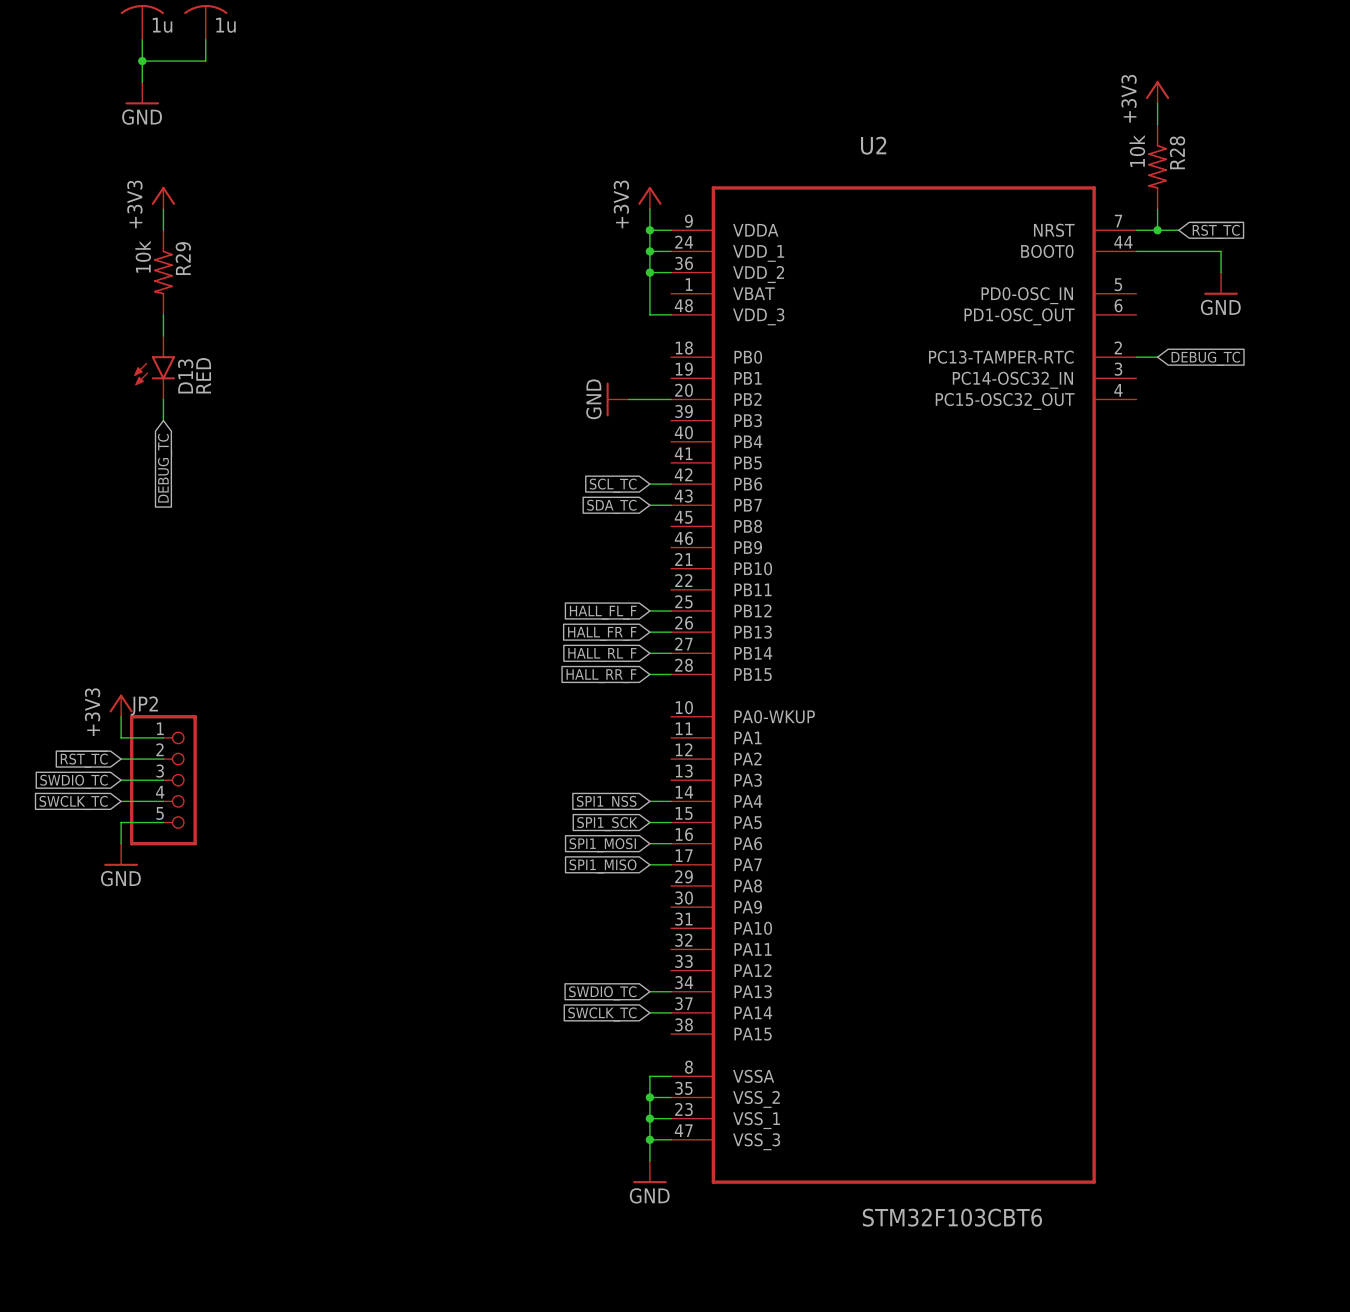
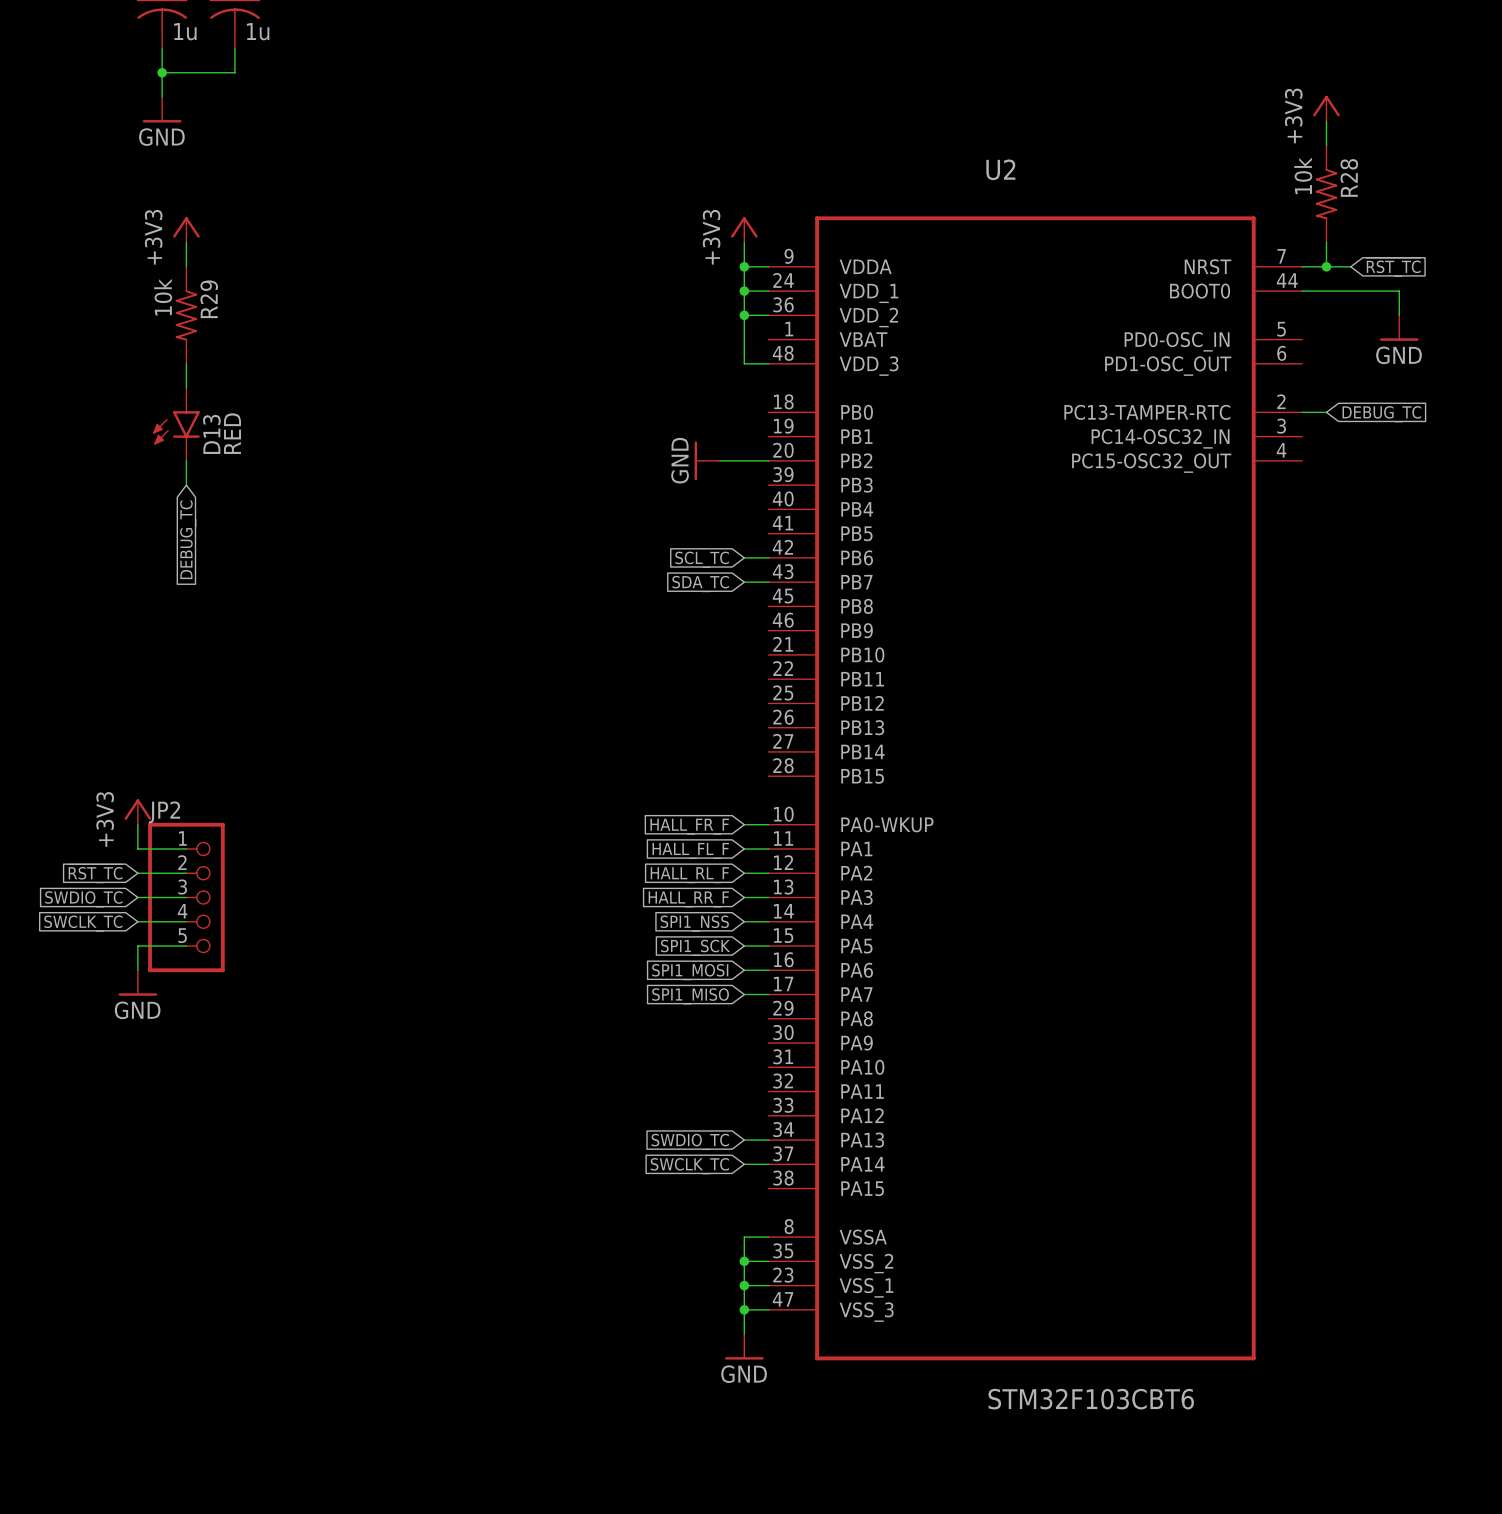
wire: (649, 611) (671, 611) -> (744, 897) (768, 897)
global label position: HALL_FL_F (603, 612) -> HALL_FL_F (690, 850)
wire: (649, 632) (671, 632) -> (744, 873) (768, 873)
global label position: HALL_FR_F (602, 633) -> HALL_FR_F (689, 826)
wire: (649, 653) (671, 653) -> (744, 848) (768, 848)
global label position: HALL_RL_F (602, 655) -> HALL_RL_F (689, 875)
wire: (649, 674) (671, 674) -> (744, 824) (768, 824)
global label position: HALL_RR_F (601, 676) -> HALL_RR_F (688, 899)

